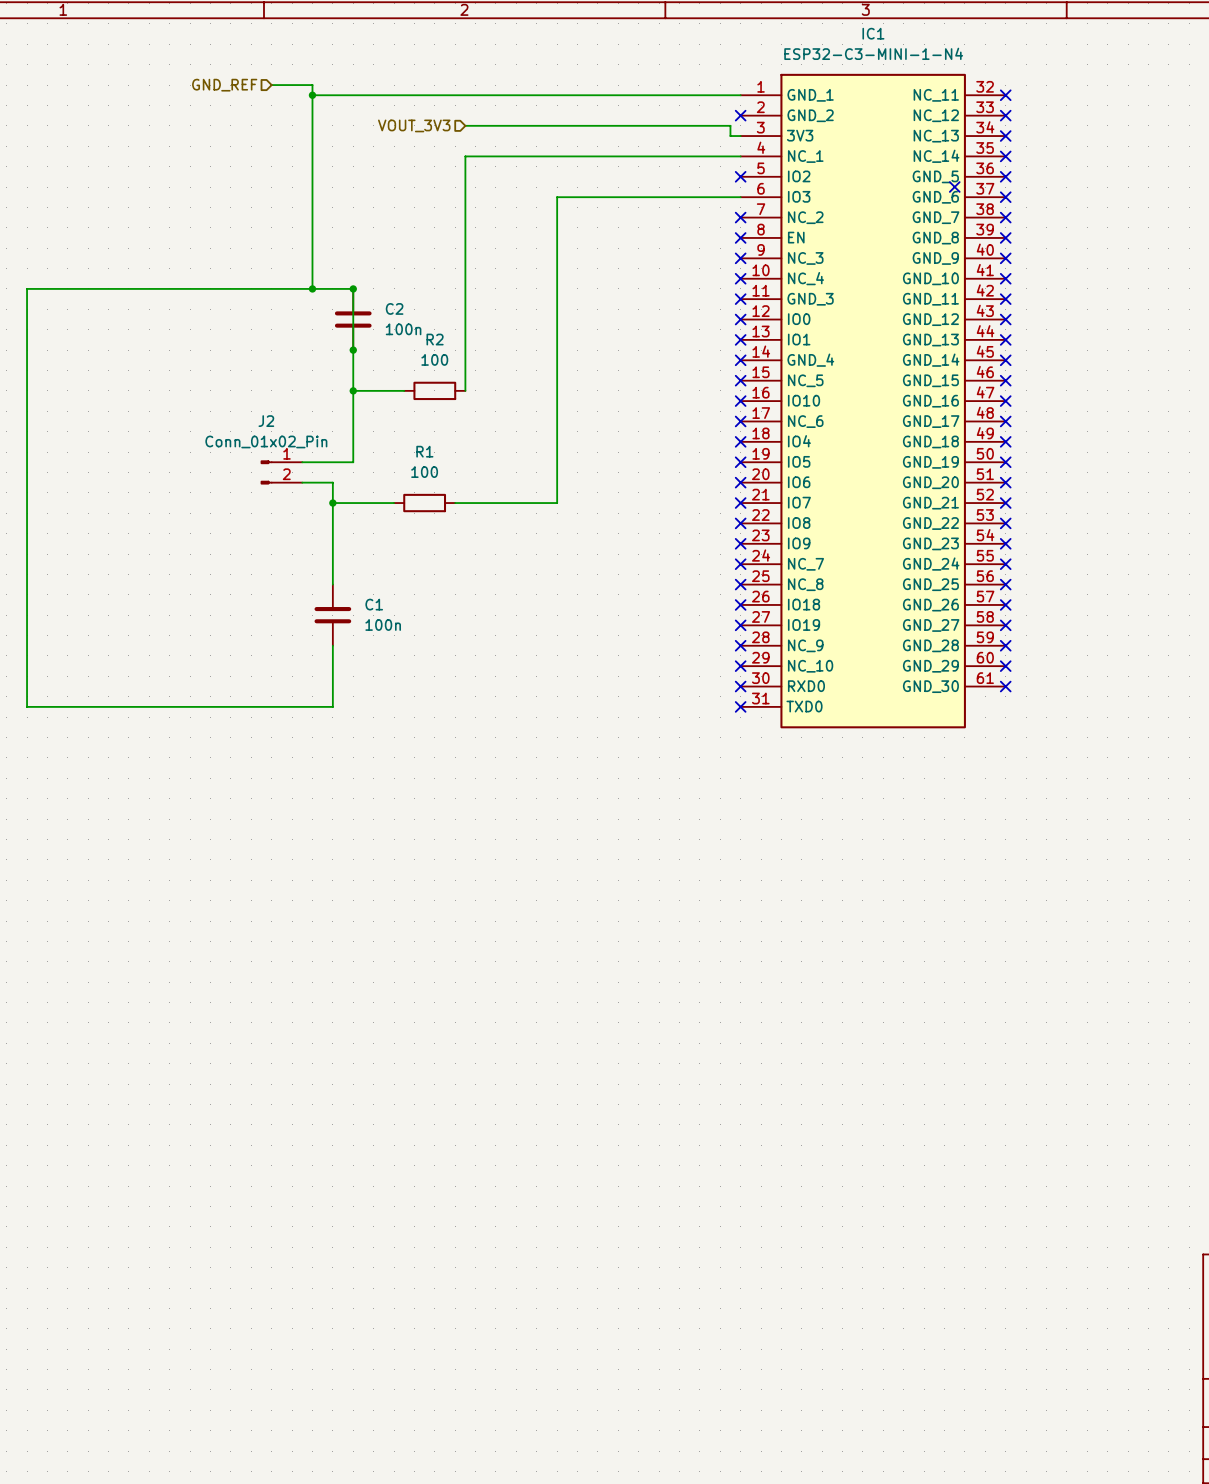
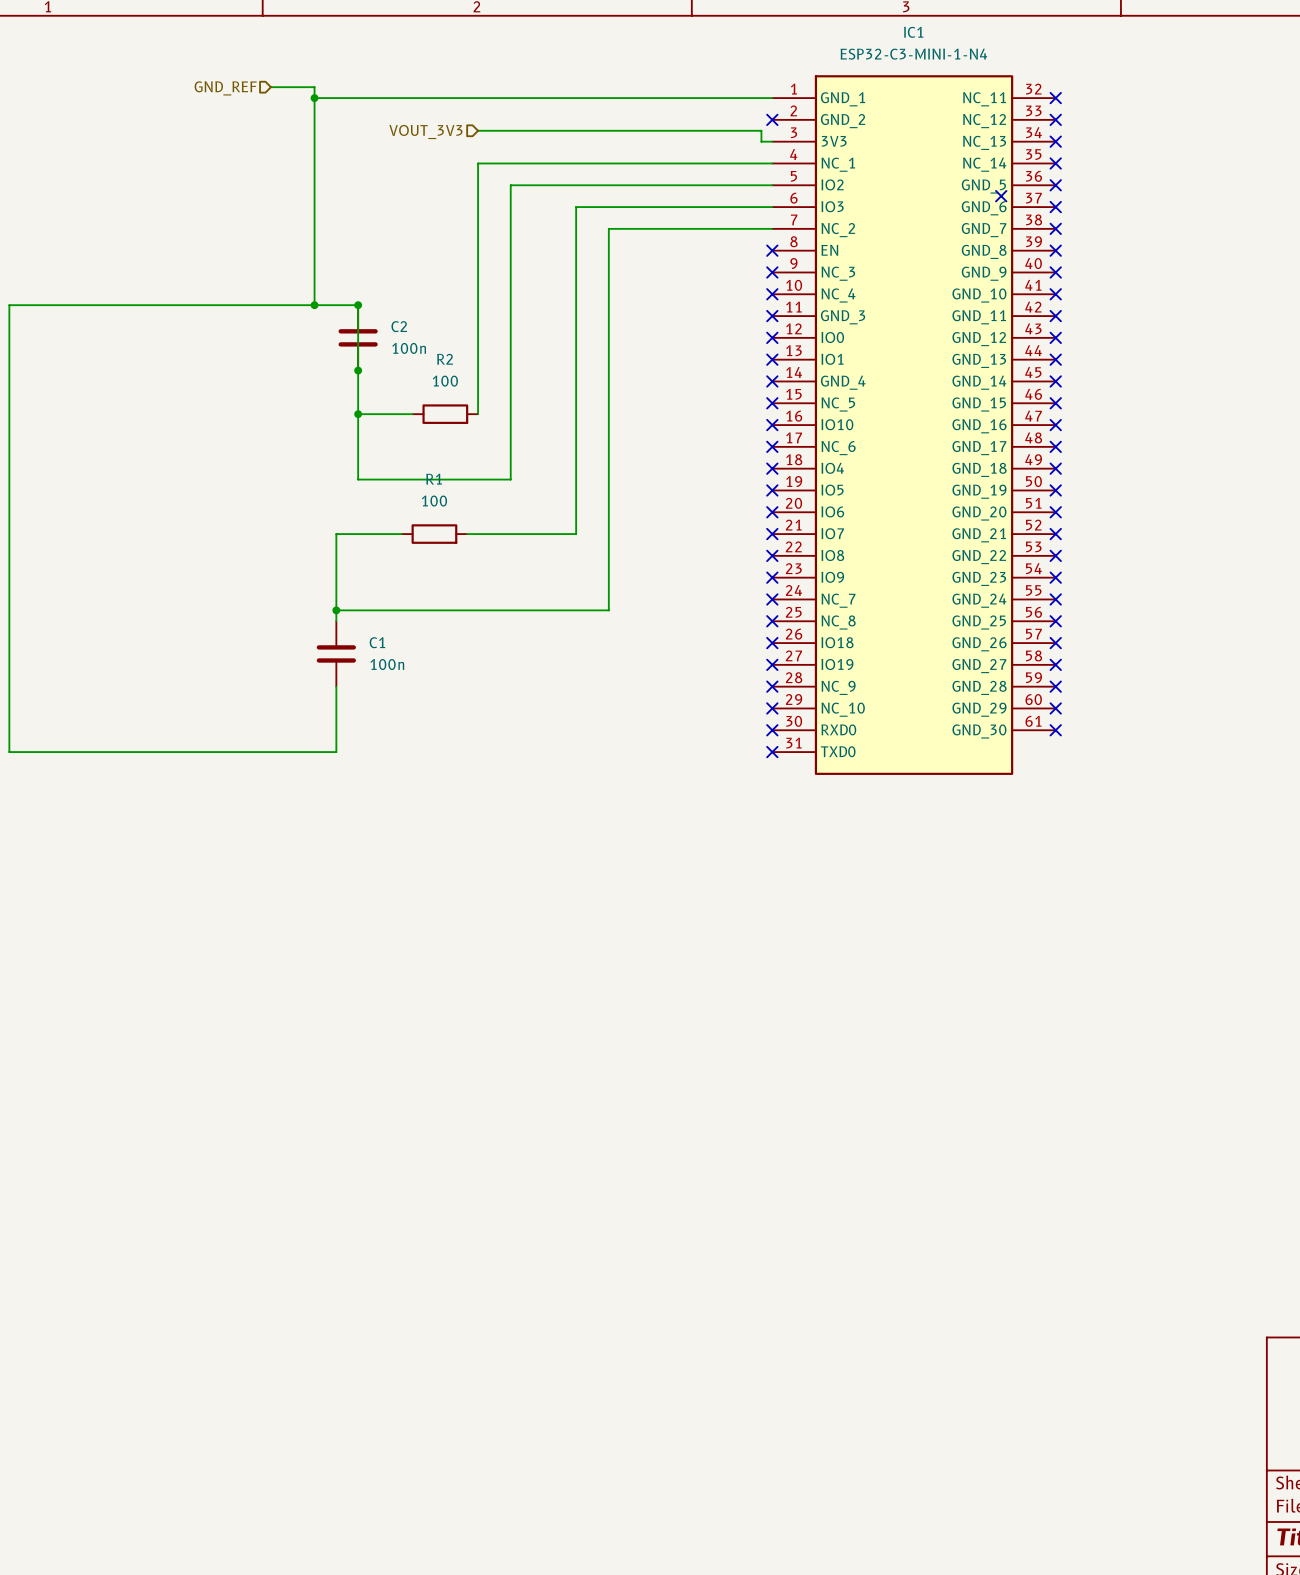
no-connect mark: (740, 176) -> none
wire: none -> (772, 228) (608, 228) (608, 610) (336, 610)
no-connect mark: (740, 217) -> none
wire: (353, 452) (353, 462) (302, 462) -> (358, 479) (510, 479) (510, 185) (772, 185)
J2: Conn_01x02_Pin (281, 472) -> none
wire: (302, 482) (332, 482) (332, 503) -> none
junction: (332, 503) -> none
junction: none -> (336, 610)

